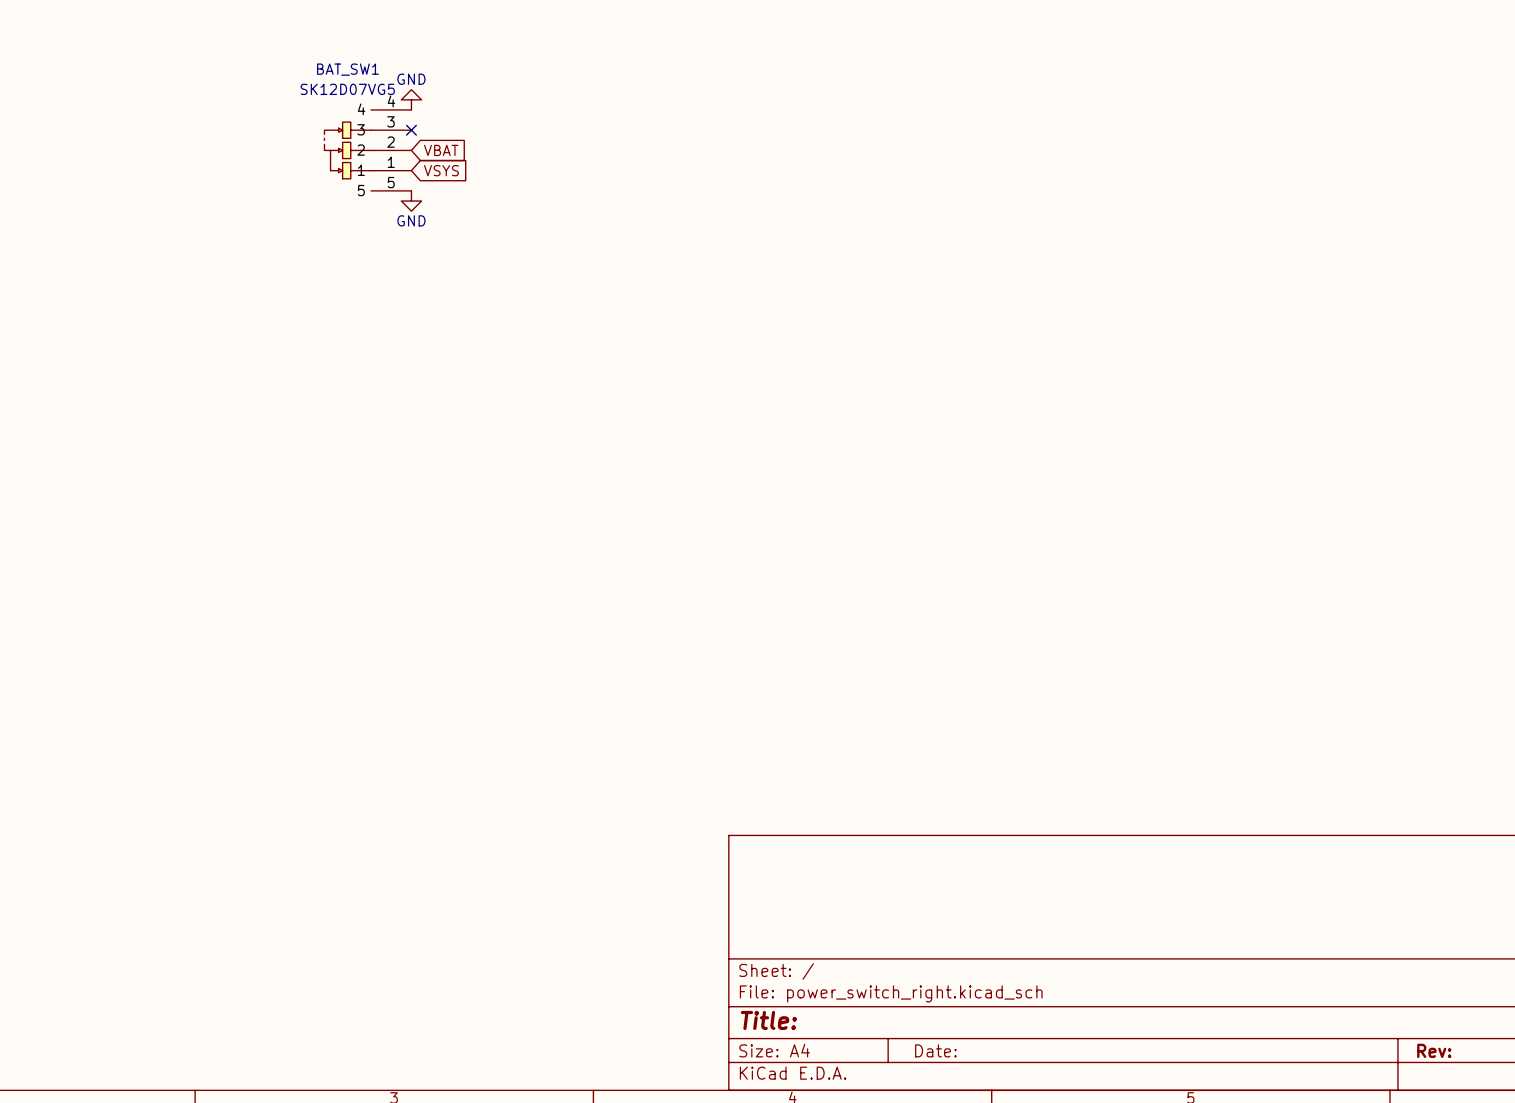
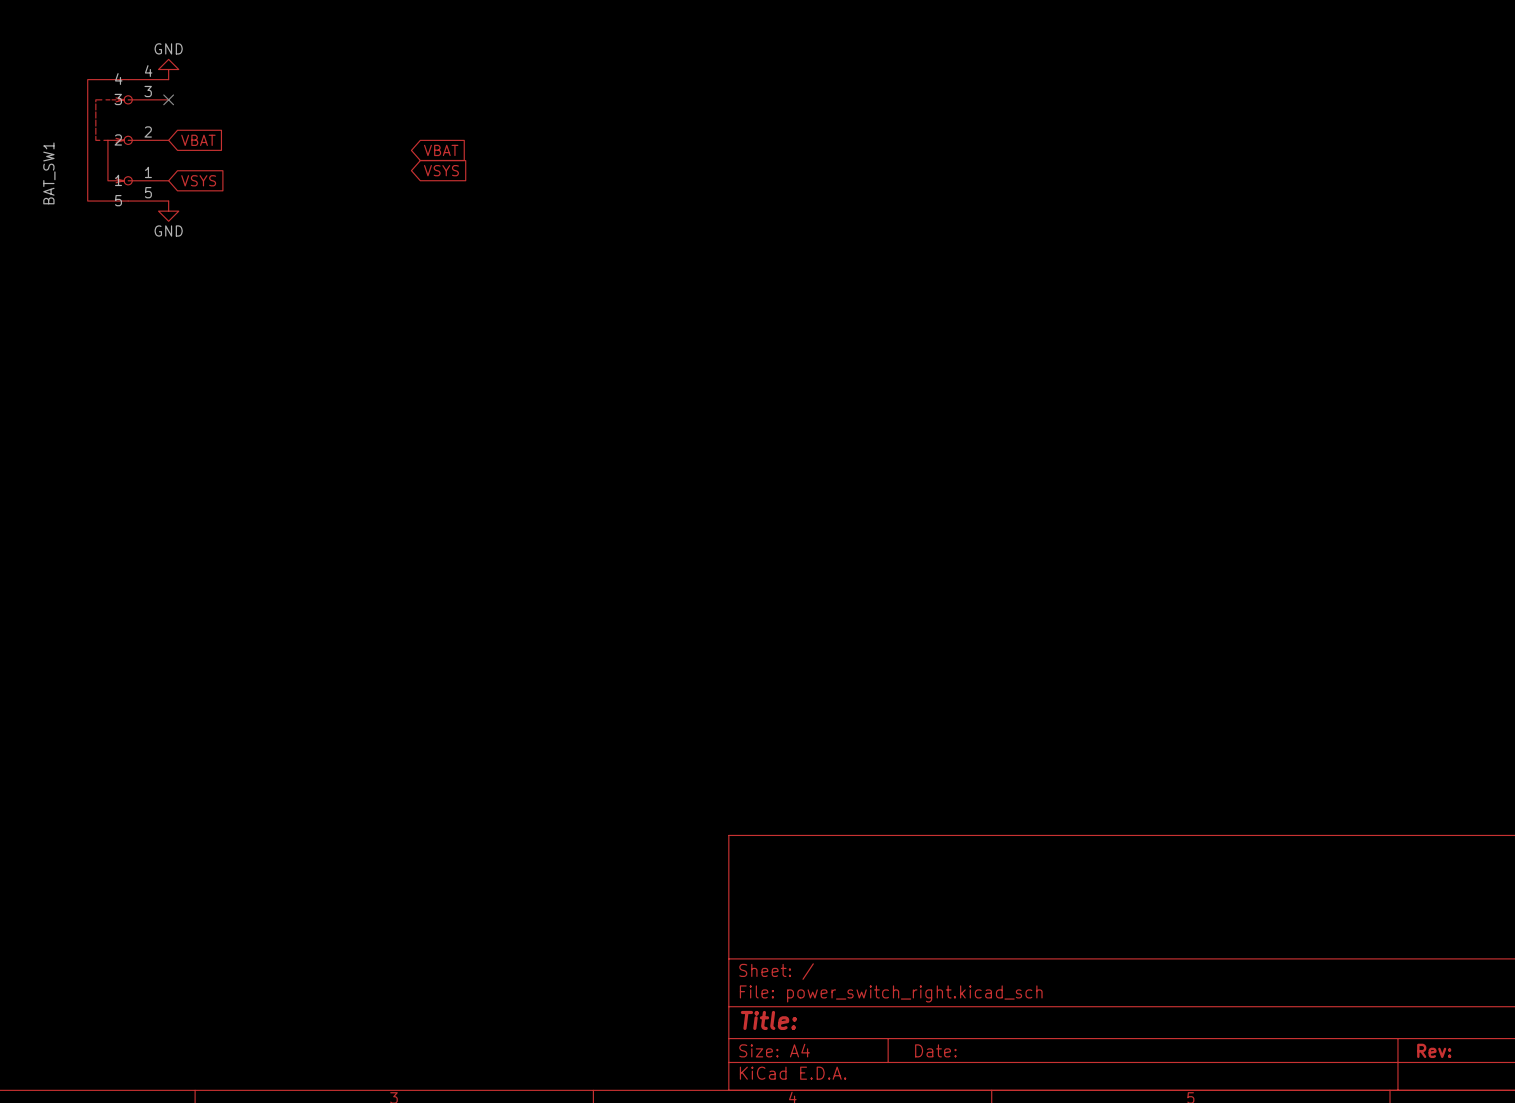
power symbol: none -> GND (168, 69)
BAT_SW1 name position: BAT_SW1 (347, 69) -> BAT_SW1 (49, 173)
BAT_SW1 value: SK12D07VG5 (347, 89) -> none
no-connect mark: none -> (168, 99)
power symbol: GND (411, 99) -> none
BAT_SW1 symbol: [324, 109, 412, 191] -> [87, 79, 169, 202]
no-connect mark: (411, 130) -> none
global label: none -> VBAT (198, 140)
global label: none -> VSYS (198, 180)
power symbol: GND (411, 201) -> none
power symbol: none -> GND (168, 211)

